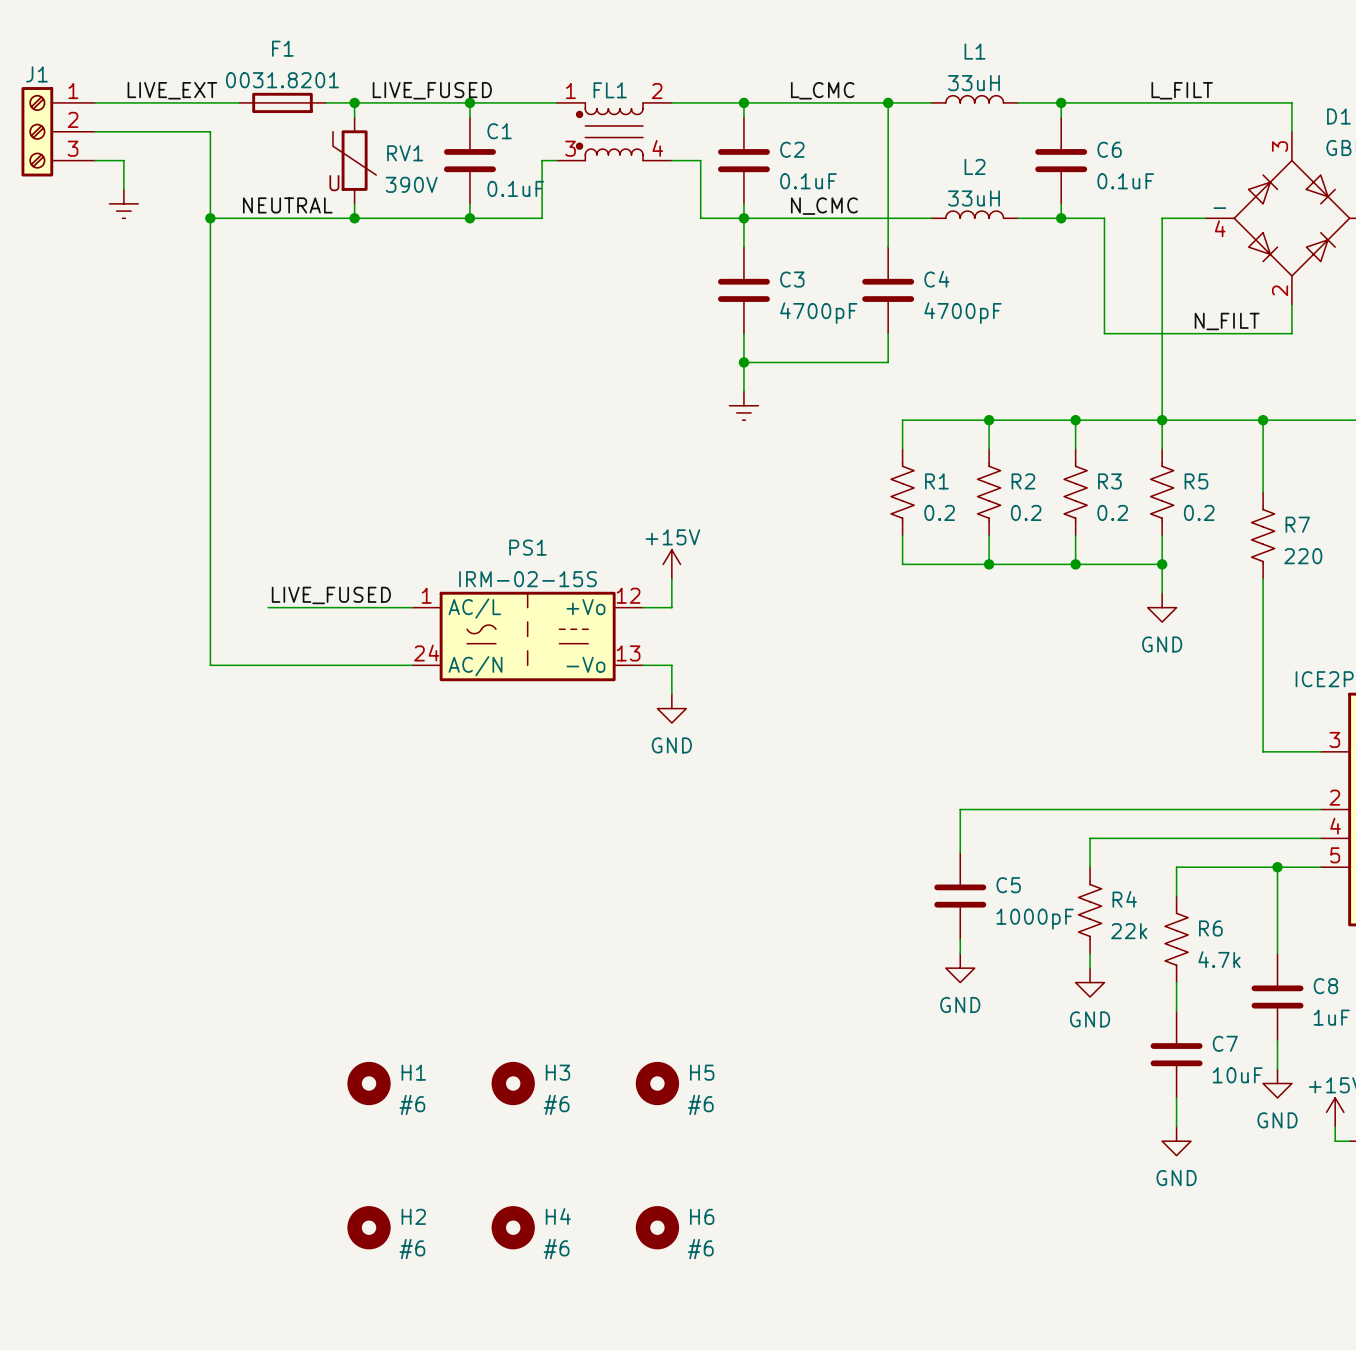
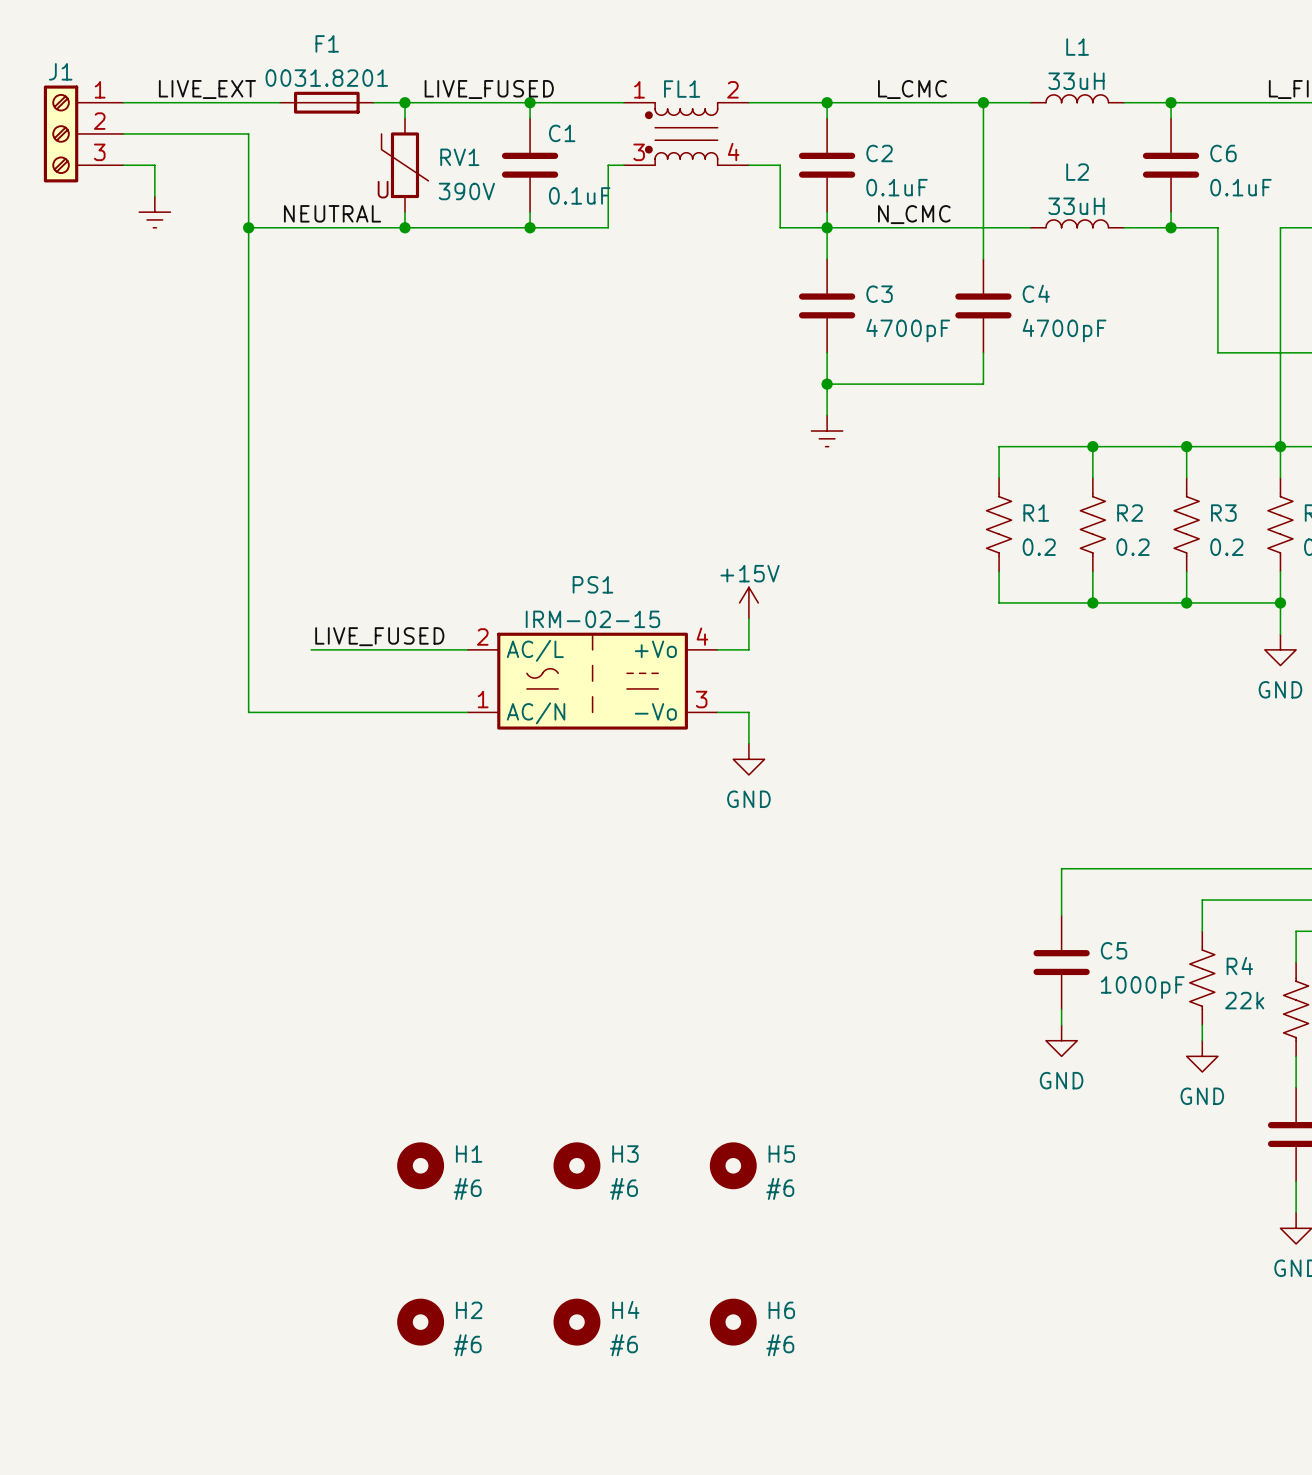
PS1 value: IRM-02-15S (527, 579) -> IRM-02-15 (592, 619)
PS1 pin number: 1 (426, 595) -> 2 (482, 636)
PS1 pin number: 12 (628, 595) -> 4 (702, 636)
PS1 pin number: 24 (426, 653) -> 1 (483, 699)
PS1 pin number: 13 (628, 653) -> 3 (701, 699)

